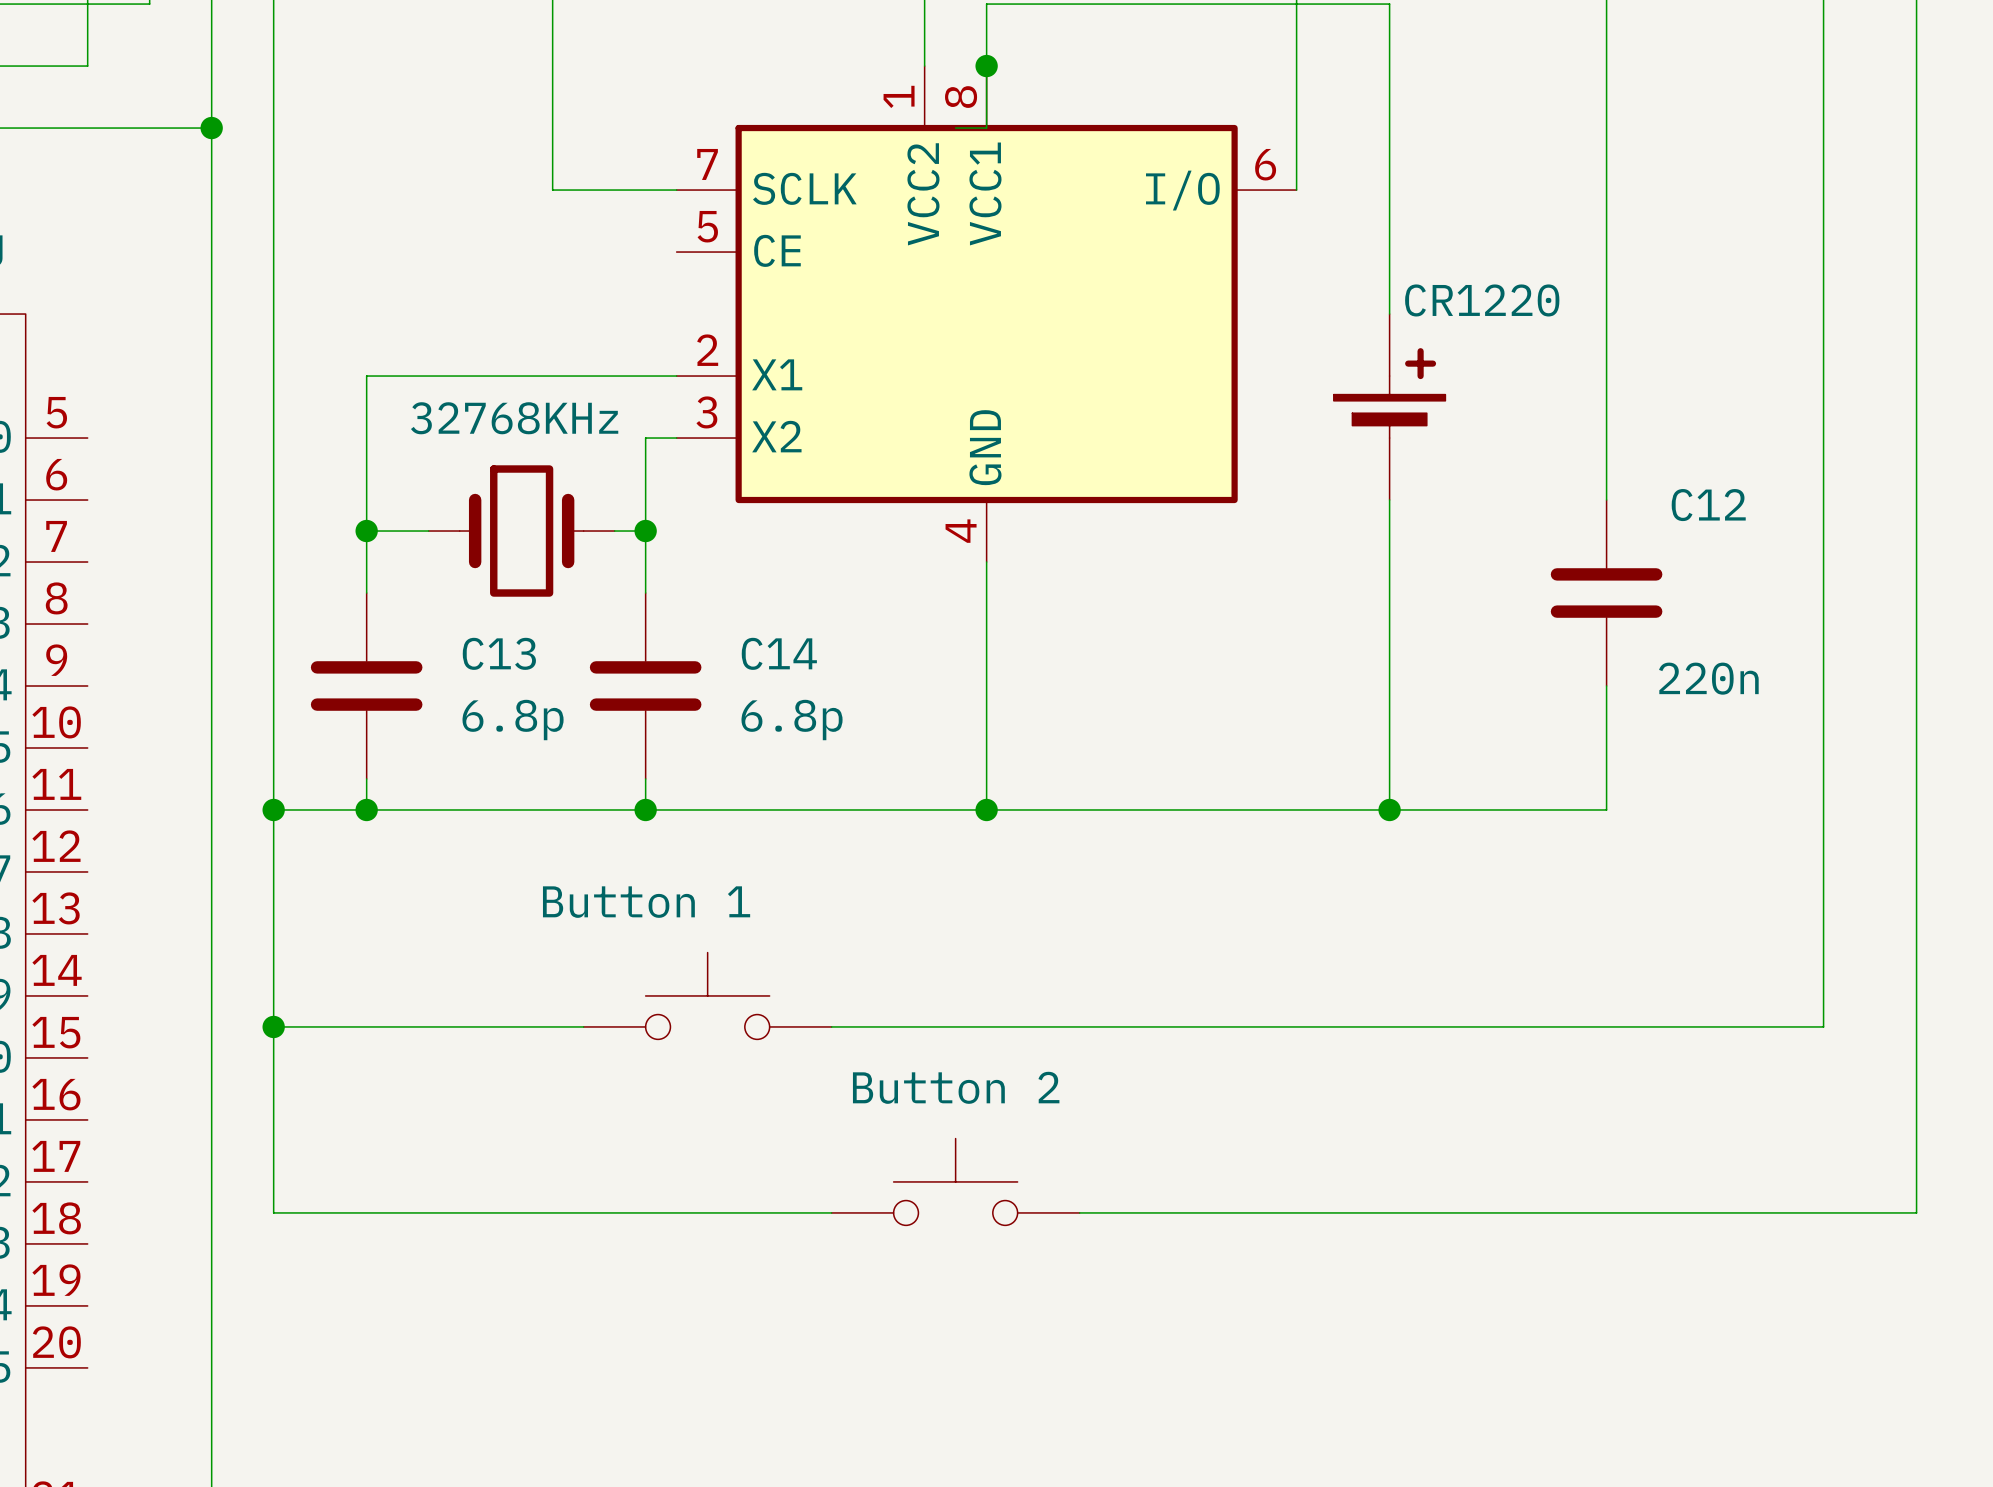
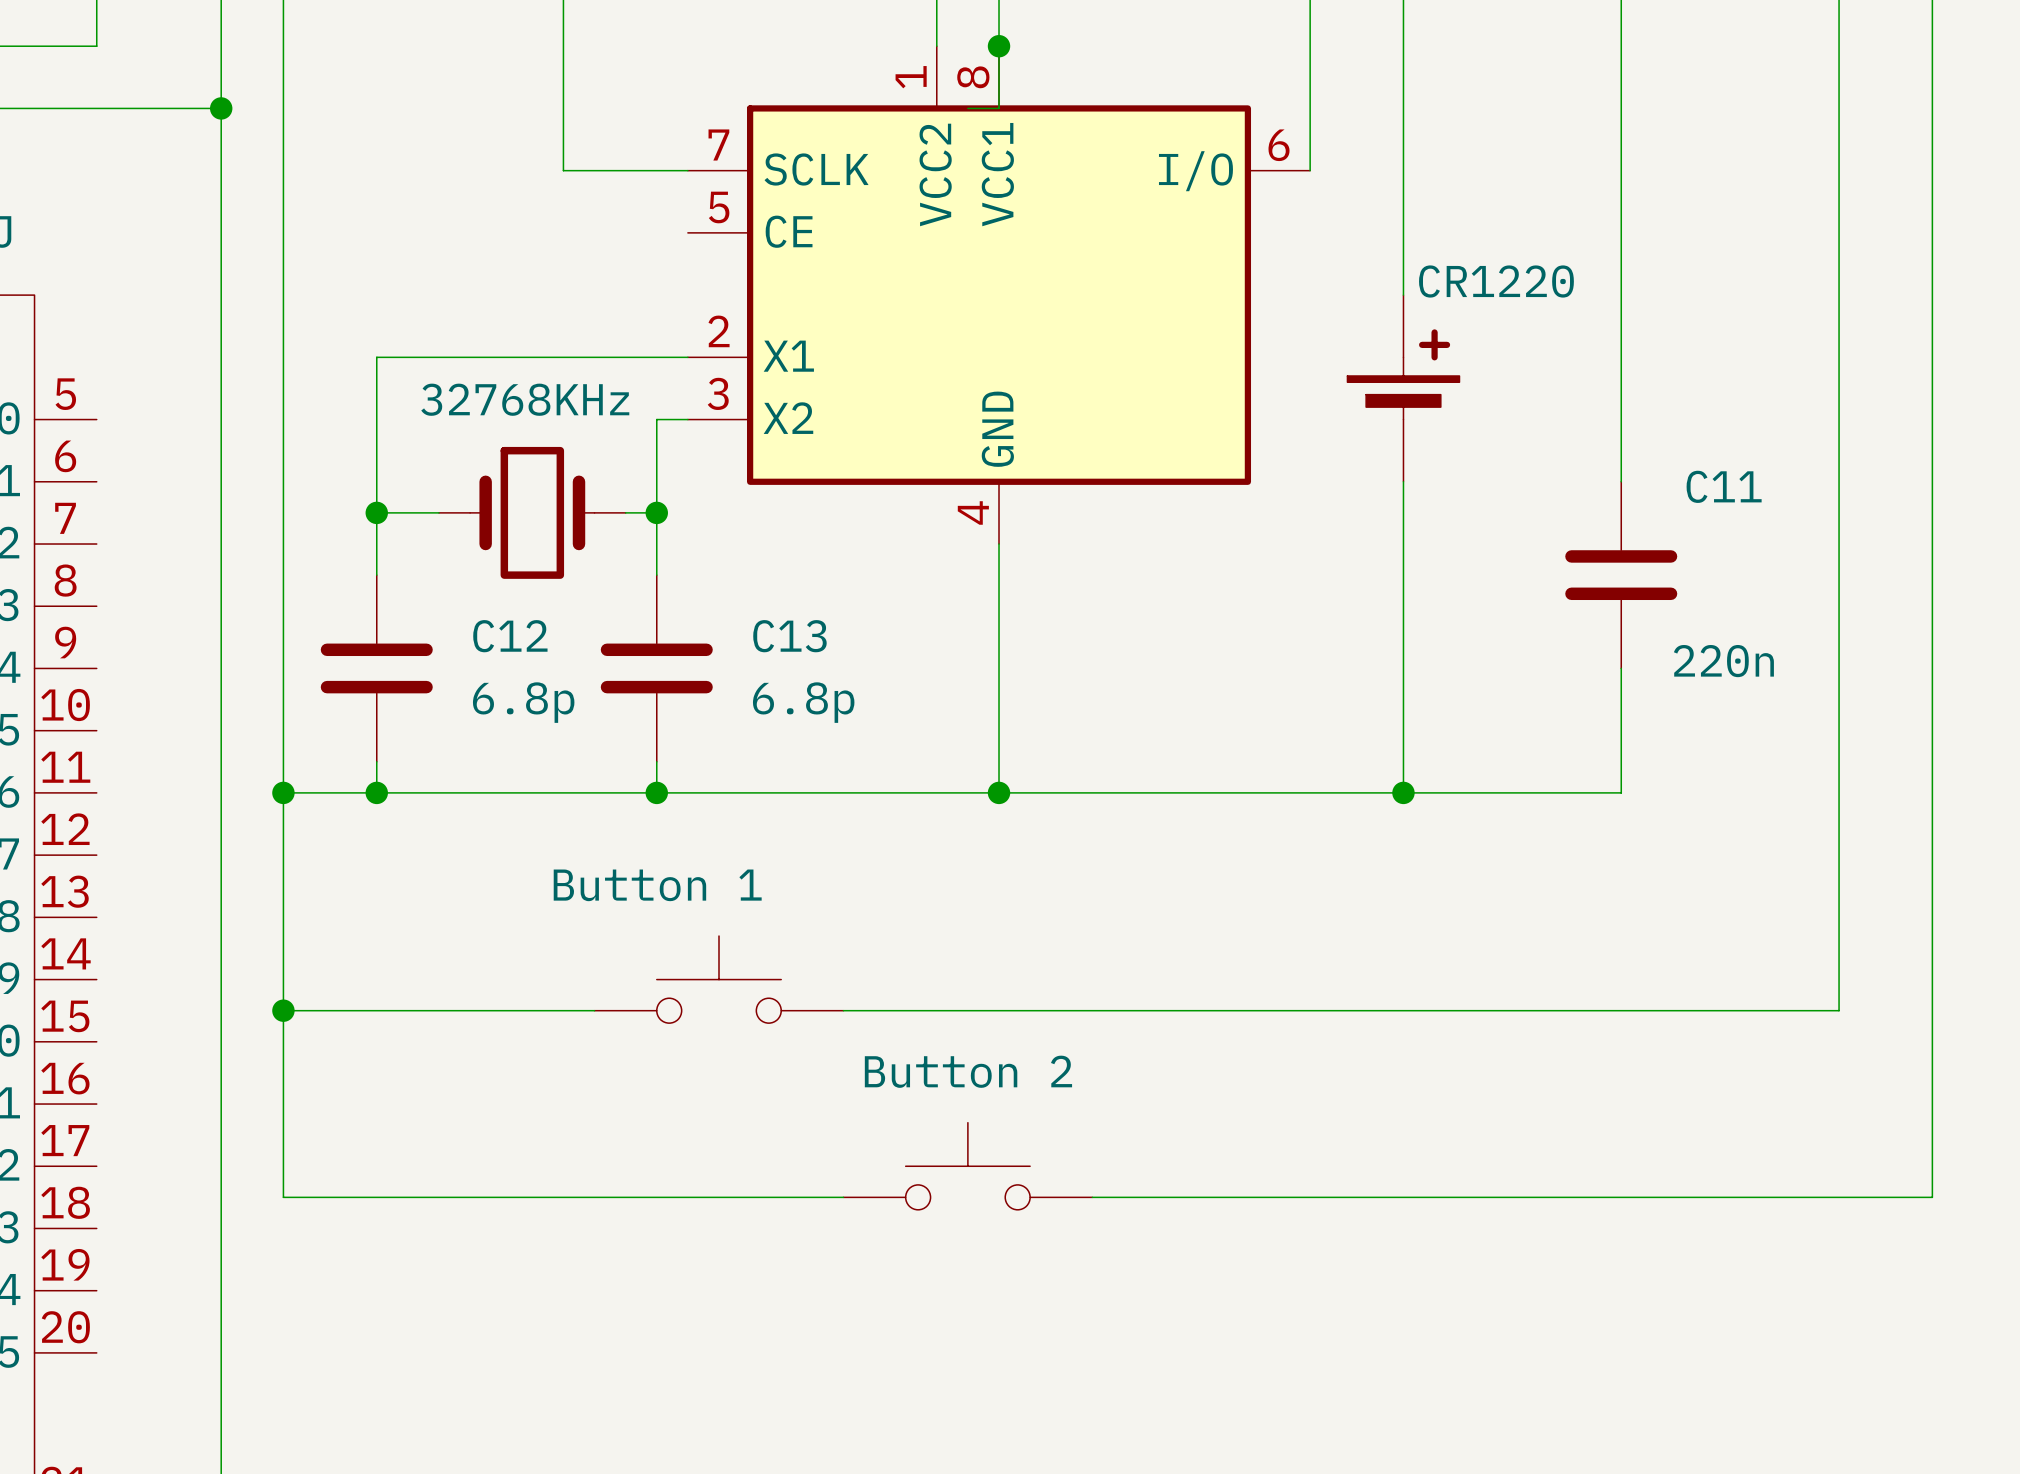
C12 name: C12 (1708, 505) -> C11 (1724, 486)
C13 name: C13 (499, 653) -> C12 (510, 636)
C14 name: C14 (779, 653) -> C13 (789, 636)

